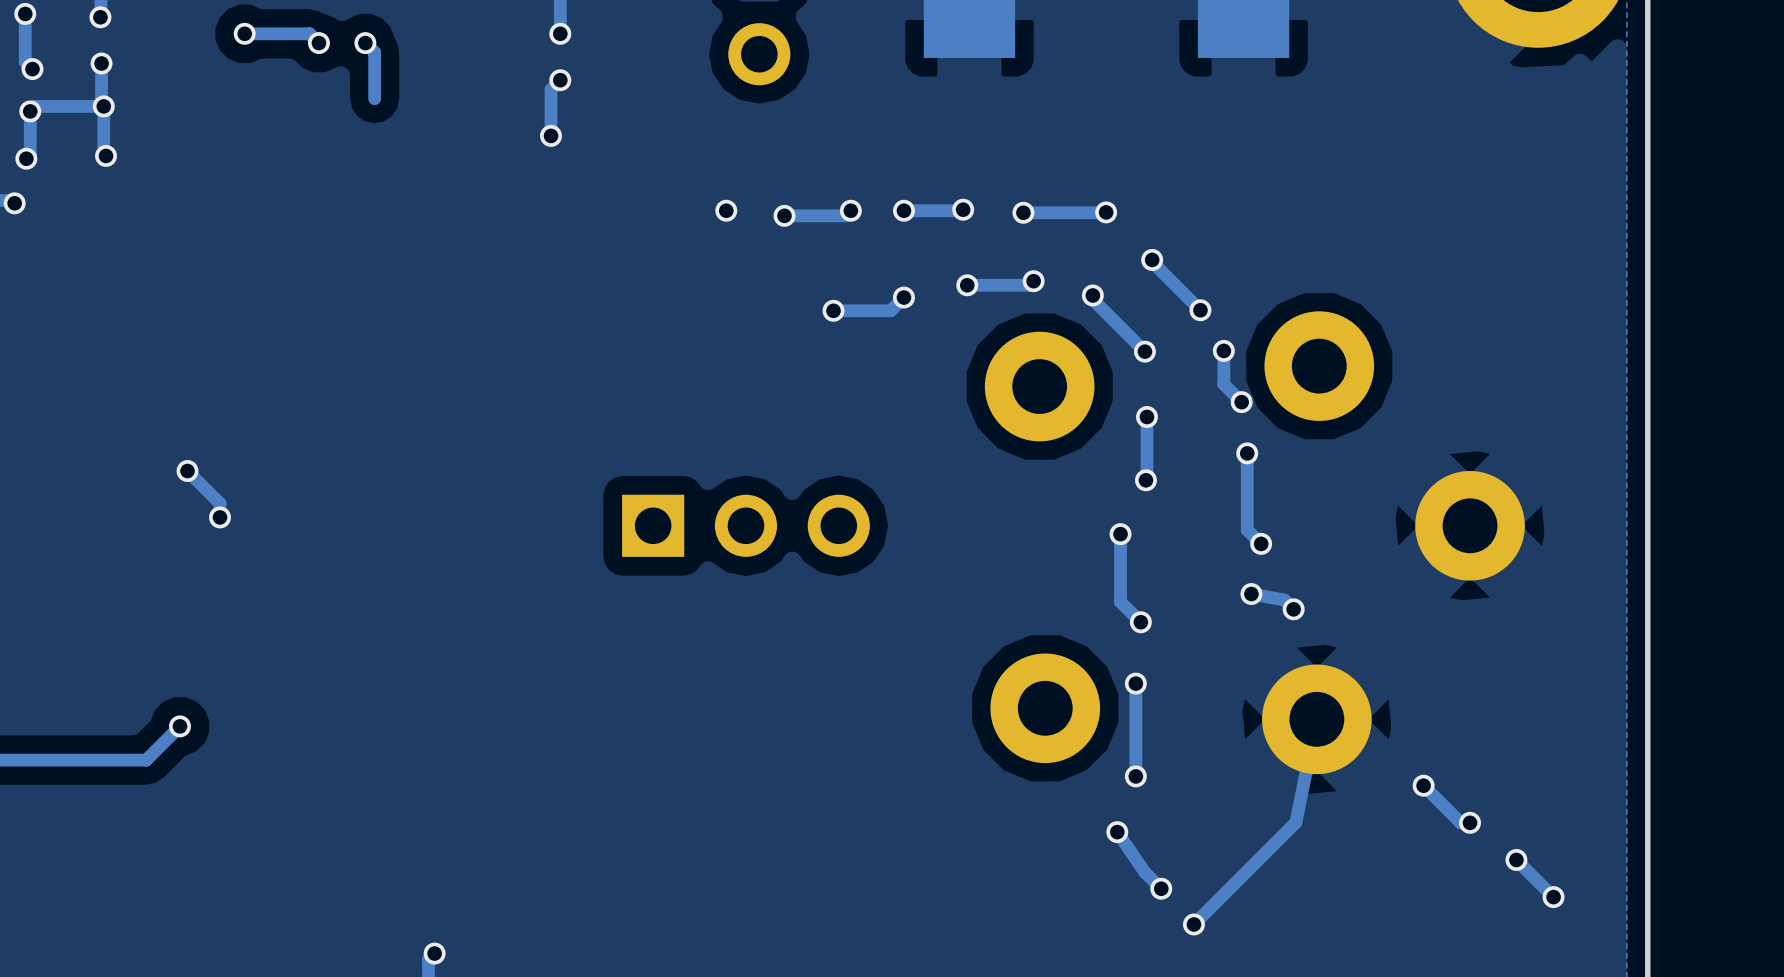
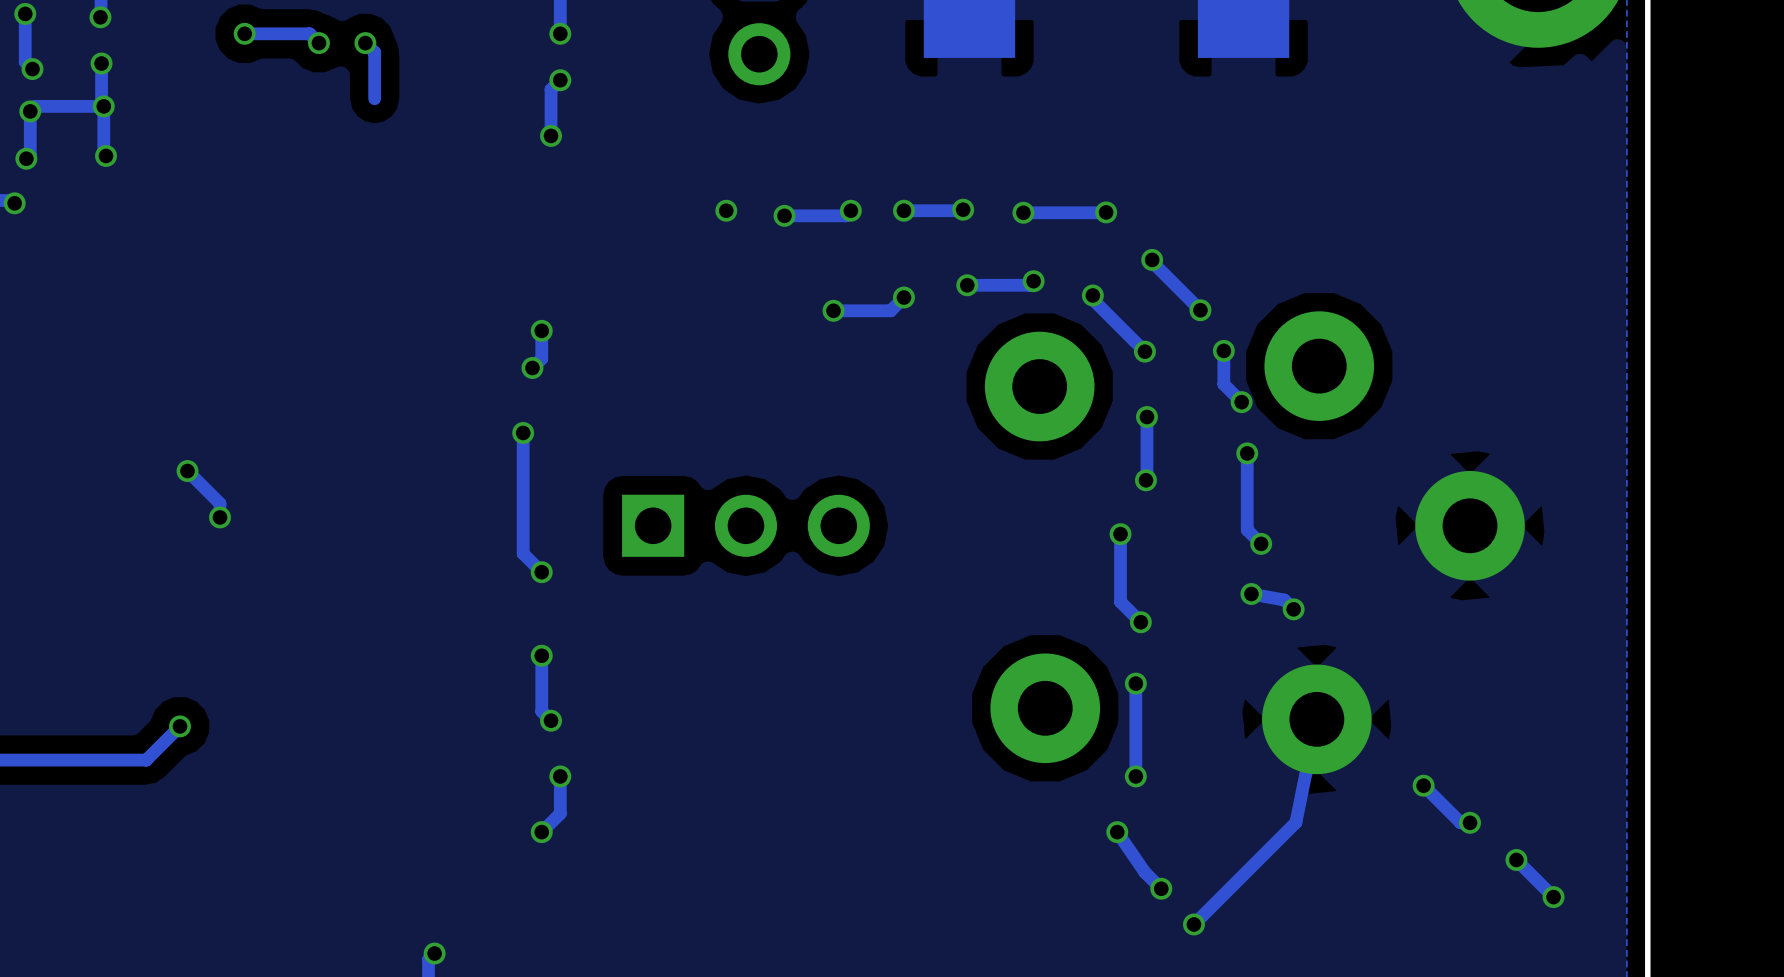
track: none -> (541, 330) (541, 358) (532, 367)
via: none -> (541, 330)
via: none -> (532, 367)
track: none -> (523, 432) (523, 553) (541, 572)
via: none -> (523, 432)
via: none -> (541, 572)
track: none -> (541, 655) (541, 711) (551, 720)
via: none -> (541, 655)
via: none -> (551, 720)
track: none -> (560, 776) (560, 813) (541, 832)
via: none -> (560, 776)
via: none -> (541, 832)

